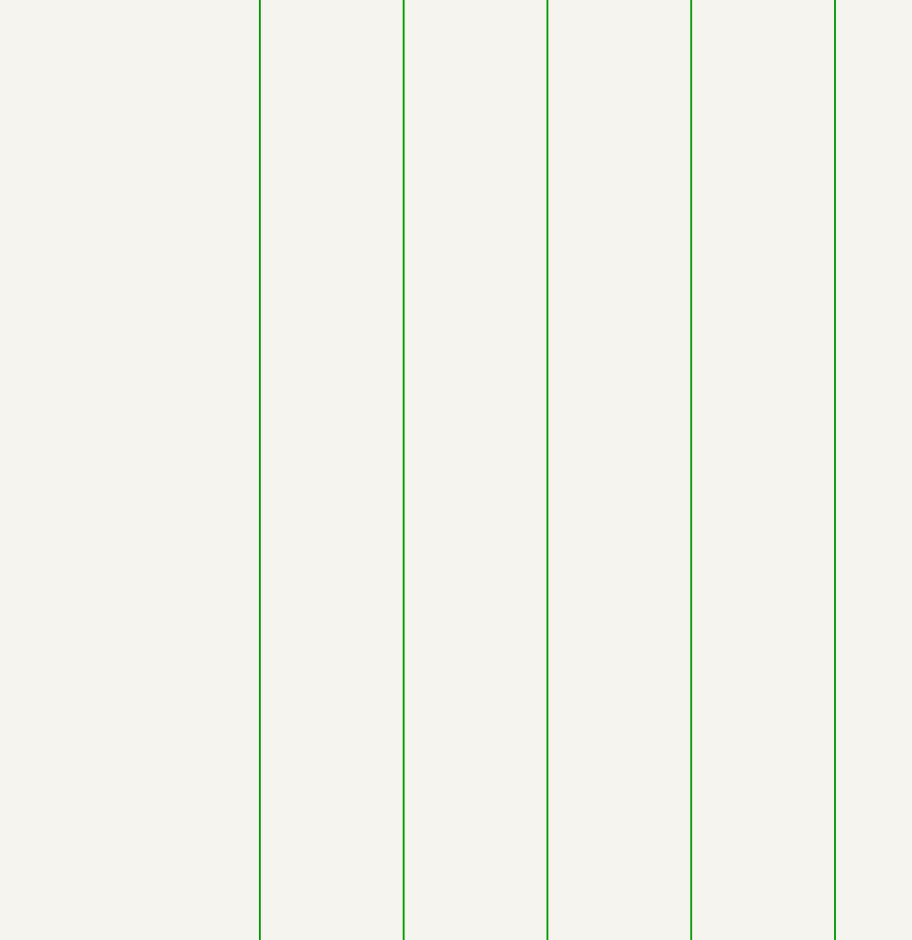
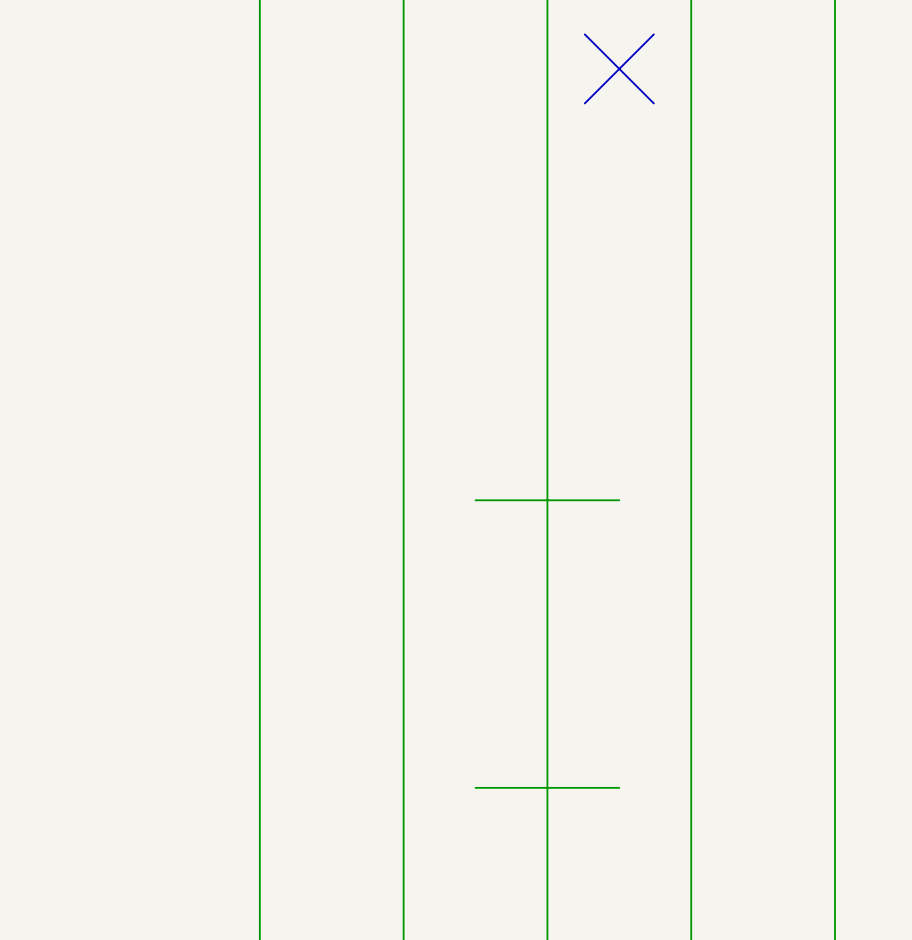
no-connect mark: none -> (619, 68)
wire: none -> (475, 500) (619, 500)
wire: none -> (475, 787) (619, 787)

